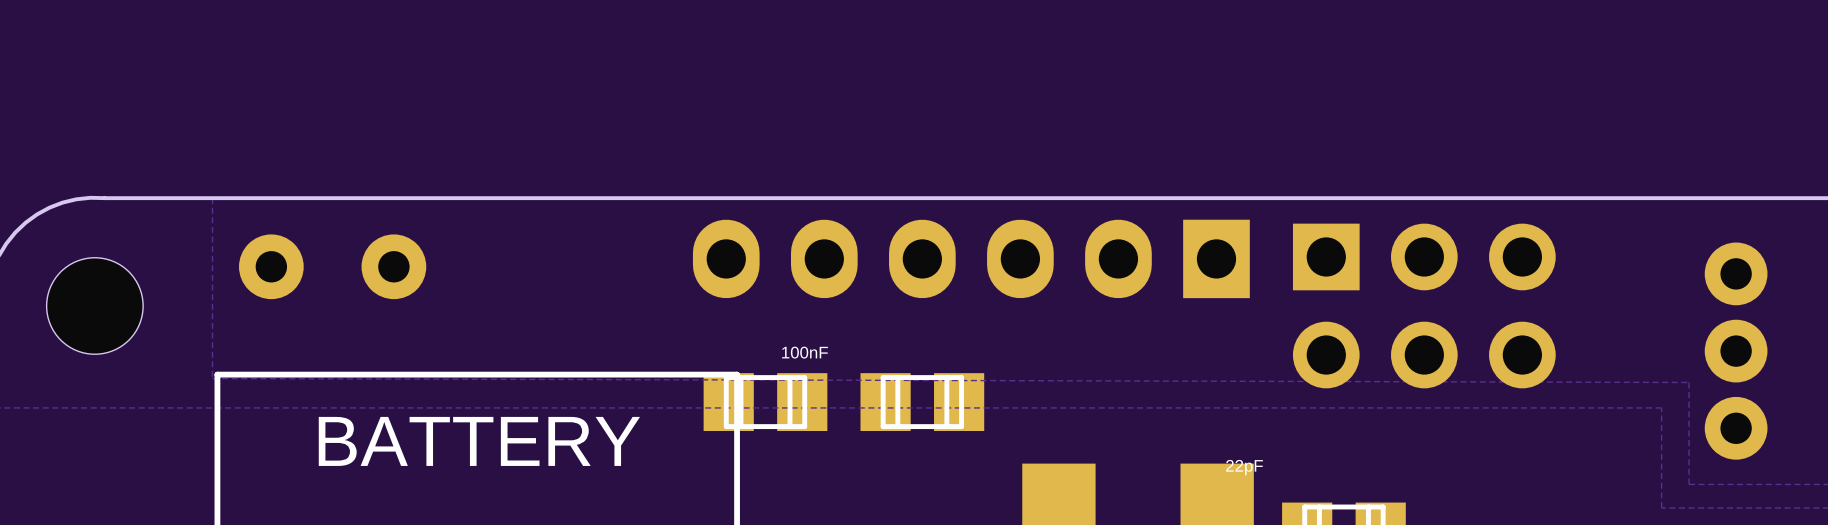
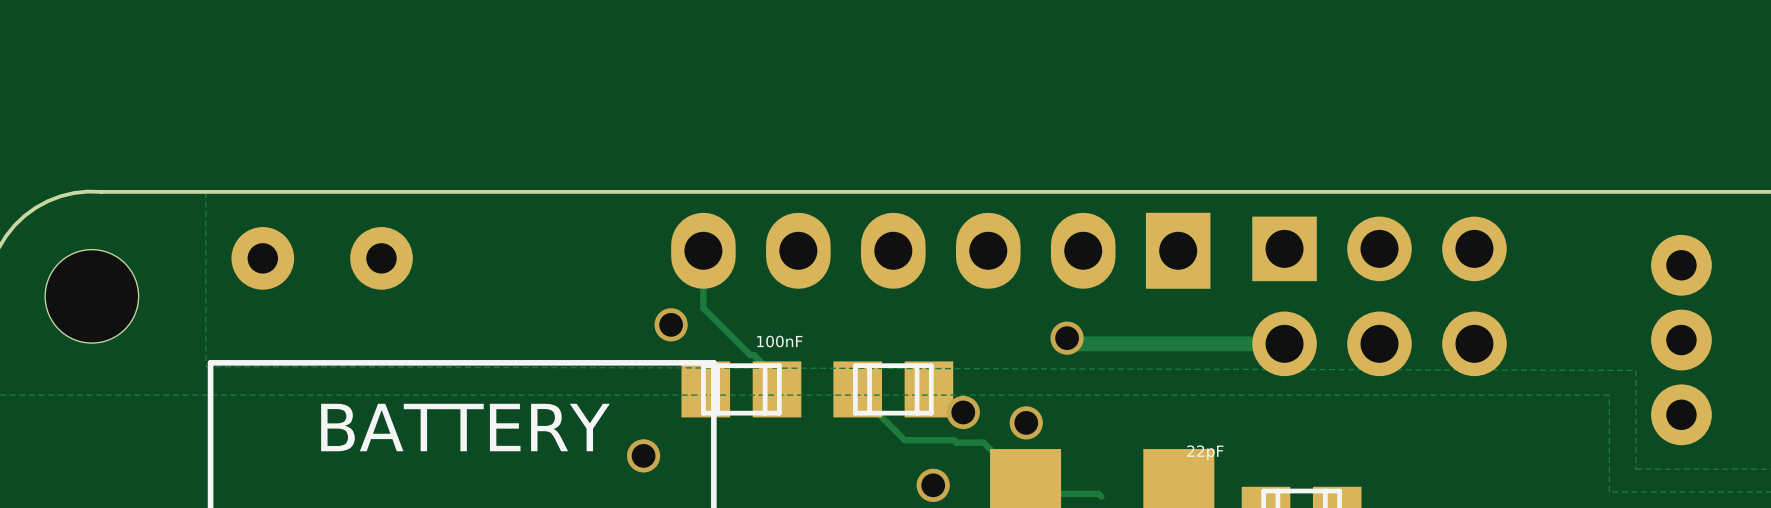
track: none -> (703, 250) (703, 308) (750, 355) (753, 355) (784, 385) (784, 389)
via: none -> (671, 324)
track: none -> (1067, 338) (1072, 343) (1284, 343)
via: none -> (1067, 338)
track: none -> (857, 389) (857, 393) (904, 440) (953, 440) (956, 442) (983, 442) (1025, 484) (1025, 493) (1098, 493) (1101, 496)
via: none -> (963, 412)
via: none -> (1026, 422)
via: none -> (643, 455)
via: none -> (933, 485)

